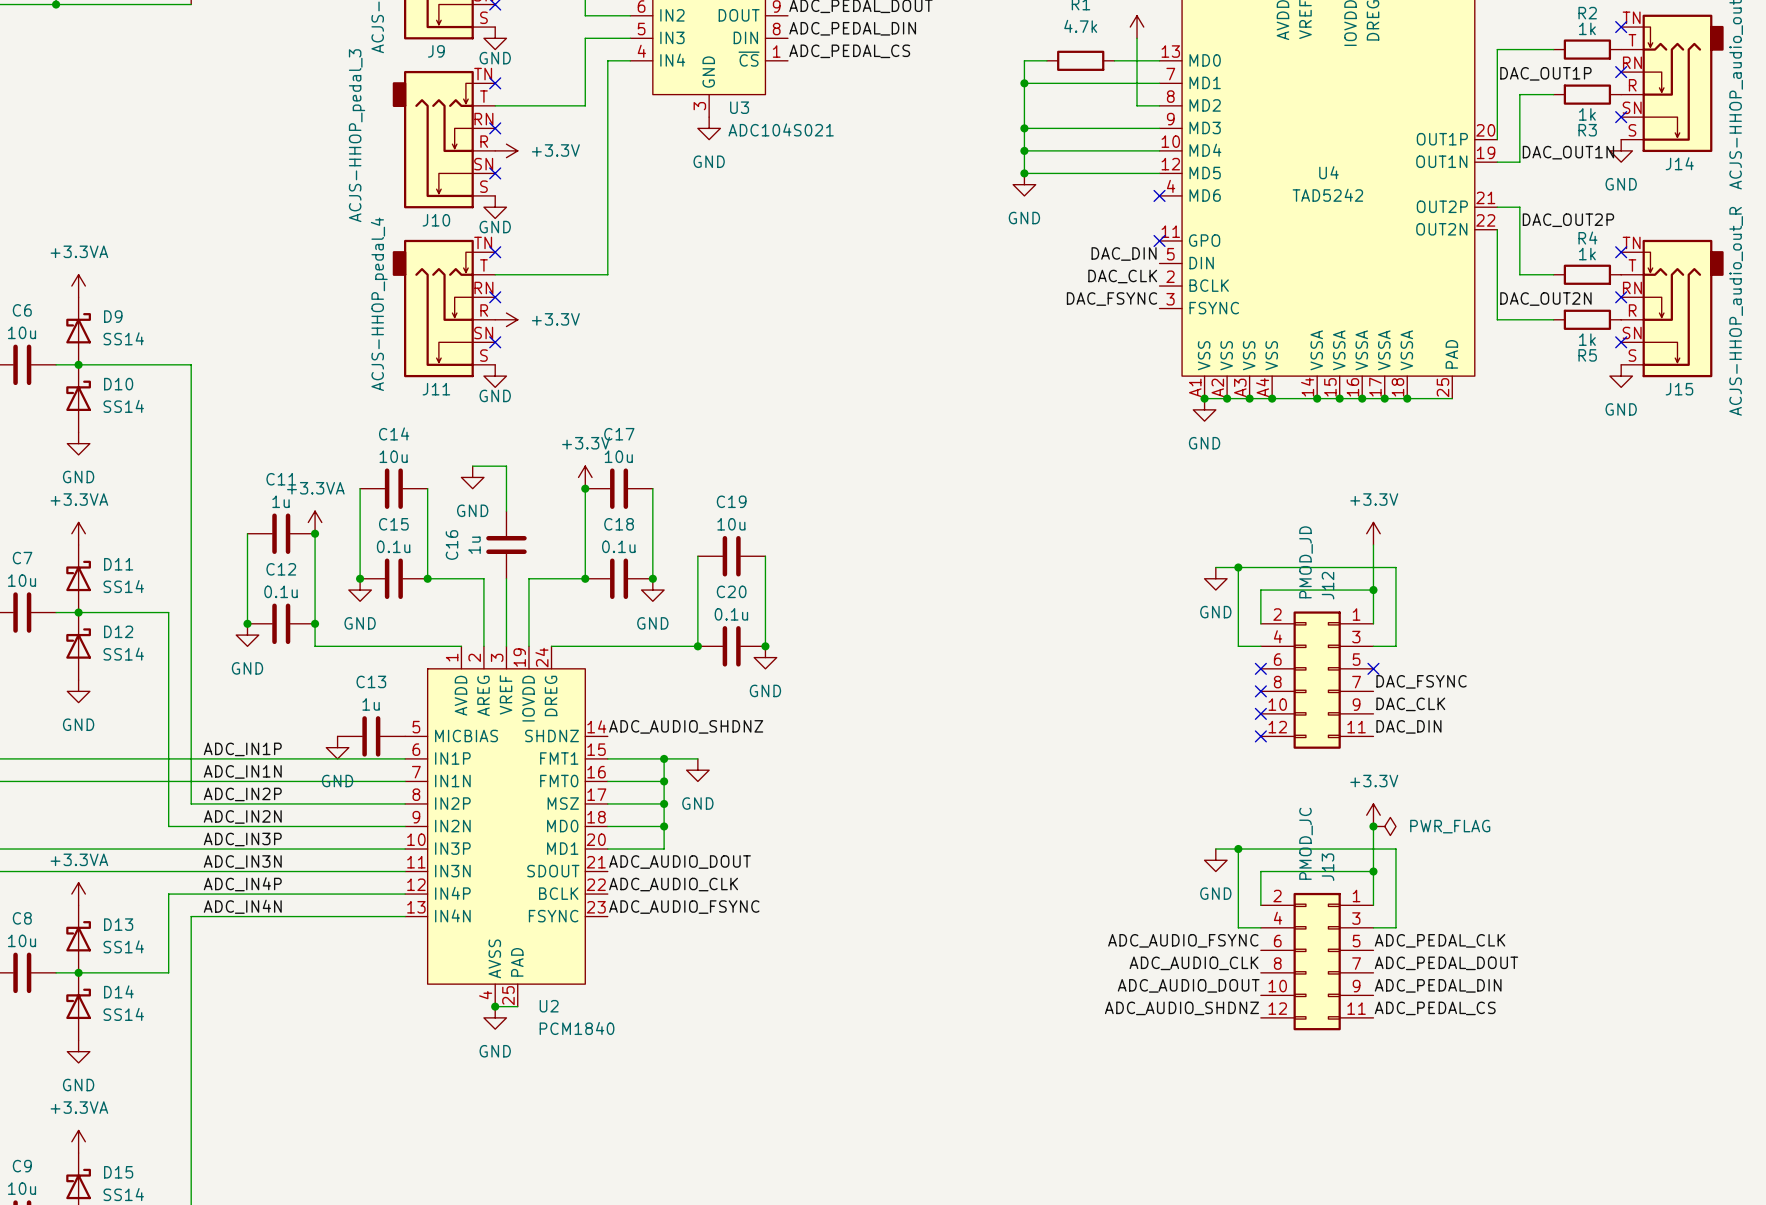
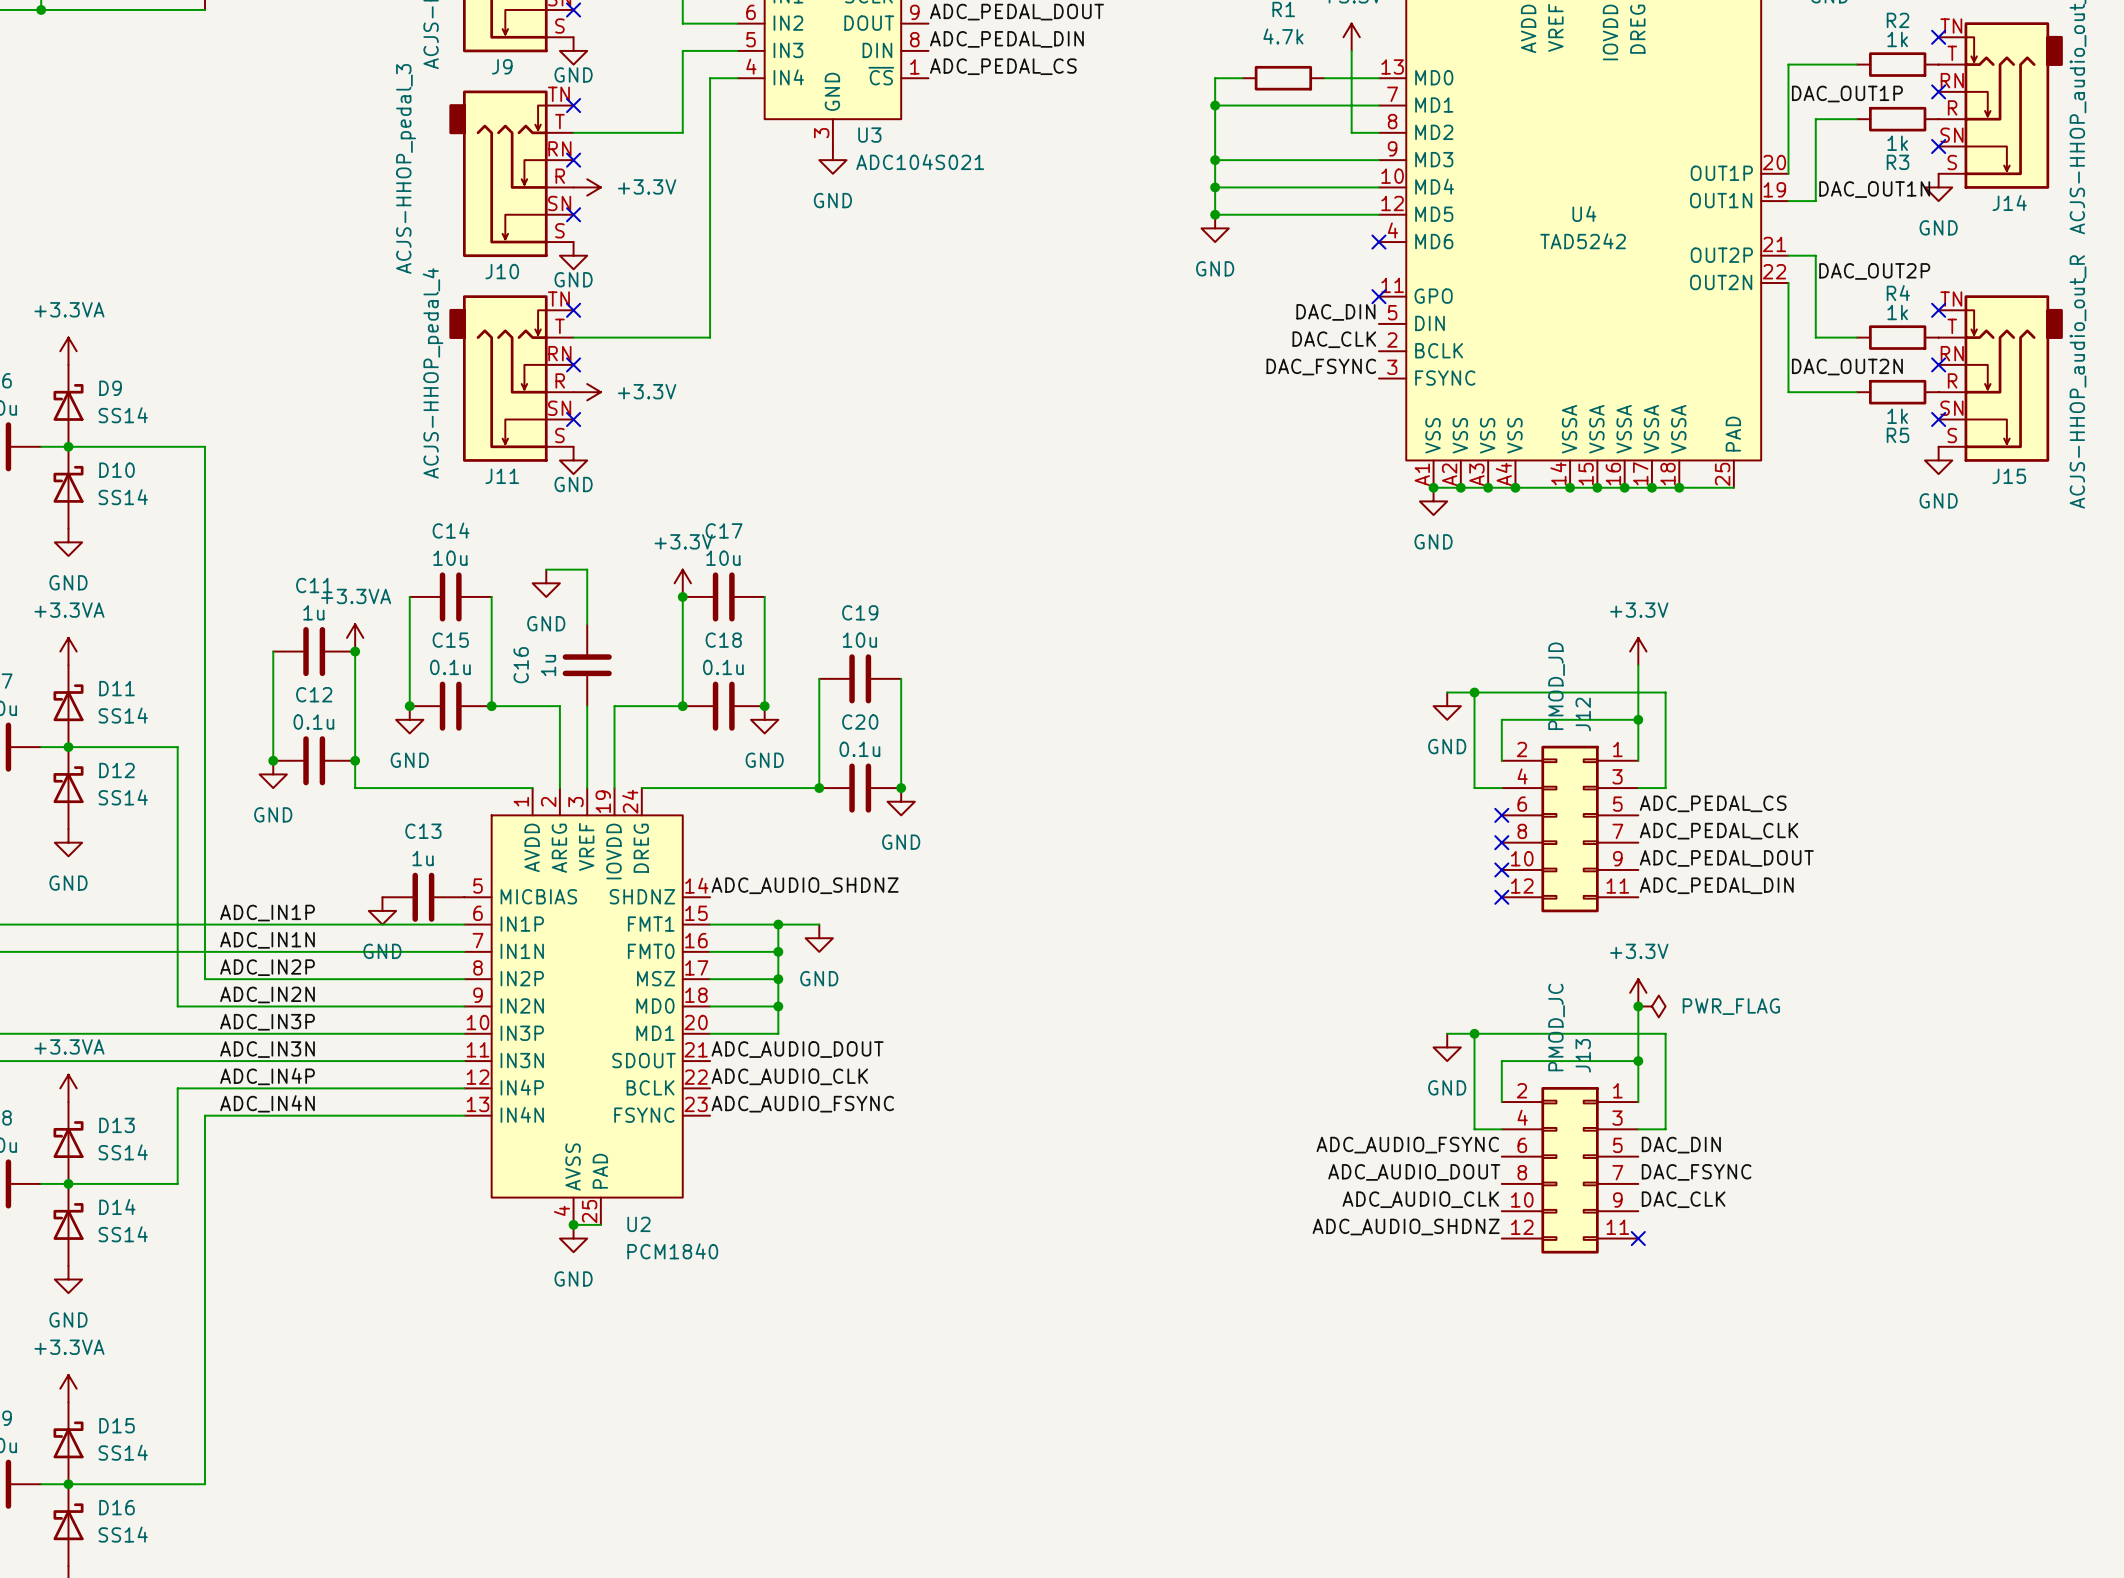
label: none -> ADC_PEDAL_CS (1713, 803)
no-connect mark: (1373, 668) -> none
label: DAC_FSYNC (1421, 681) -> ADC_PEDAL_CLK (1719, 831)
label: DAC_CLK (1410, 704) -> ADC_PEDAL_DOUT (1726, 858)
label: DAC_DIN (1408, 726) -> ADC_PEDAL_DIN (1716, 885)
label: ADC_PEDAL_CLK (1440, 940) -> DAC_DIN (1681, 1145)
label: ADC_AUDIO_CLK (1194, 963) -> ADC_AUDIO_DOUT (1414, 1172)
label: ADC_PEDAL_DOUT (1446, 963) -> DAC_FSYNC (1696, 1172)
label: ADC_AUDIO_DOUT (1188, 985) -> ADC_AUDIO_CLK (1420, 1199)
label: ADC_PEDAL_DIN (1438, 985) -> DAC_CLK (1683, 1199)
label: ADC_PEDAL_CS (1435, 1008) -> none
no-connect mark: none -> (1638, 1238)

